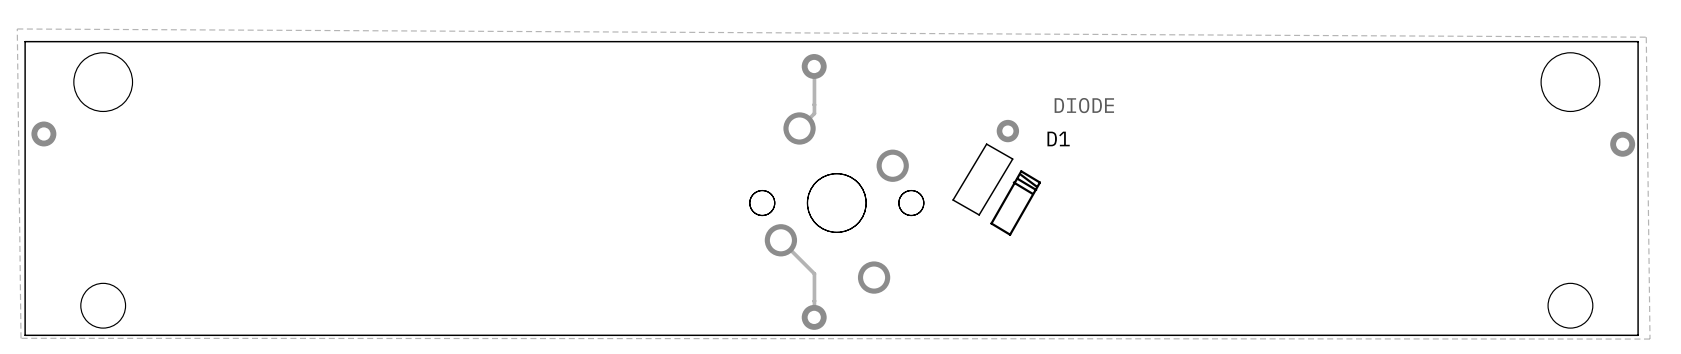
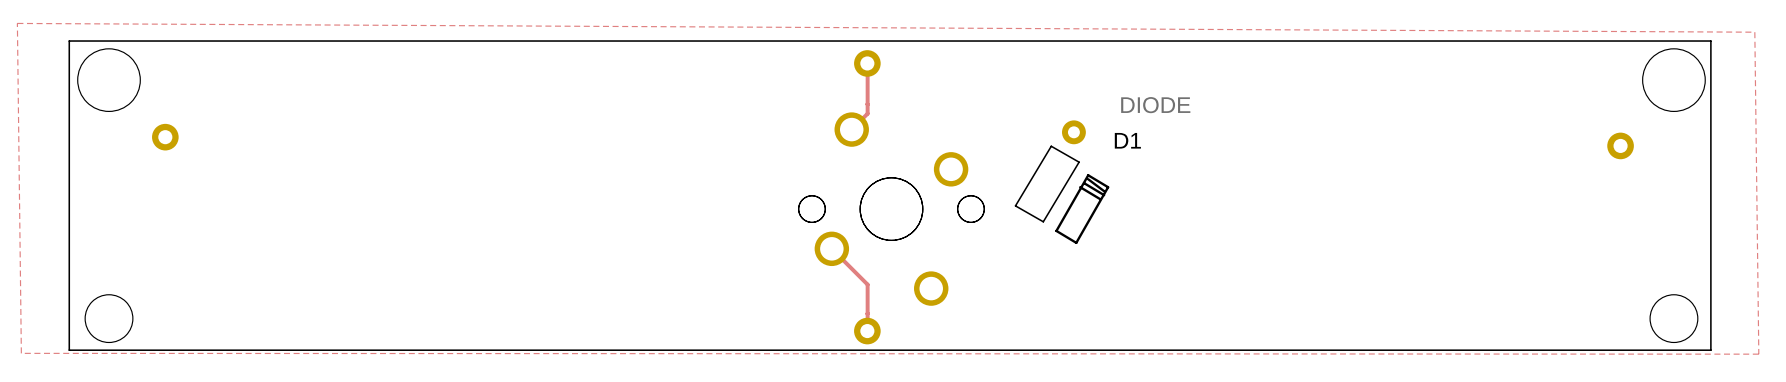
D1 footprint: [31, 54, 1636, 330] -> [152, 50, 1634, 345]
board edge: (65, 335) (25, 335) (25, 41) (1638, 41) (1638, 335) (1605, 335) -> (69, 350) (69, 41) (1710, 41) (1710, 350)

